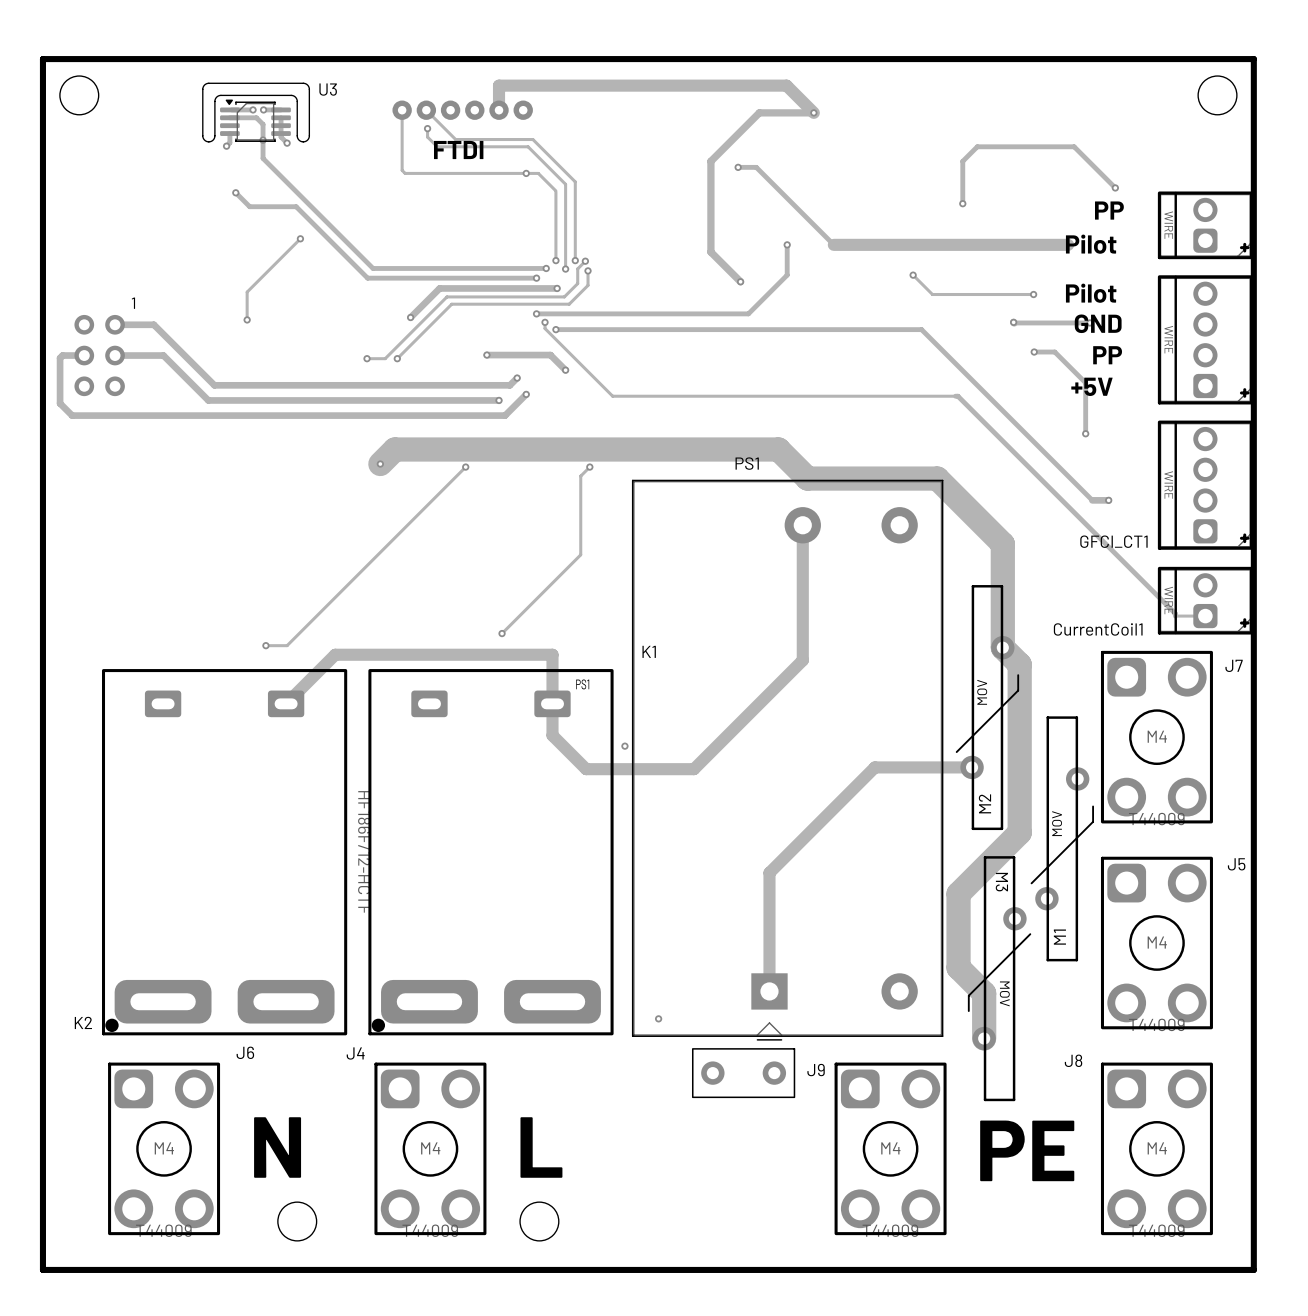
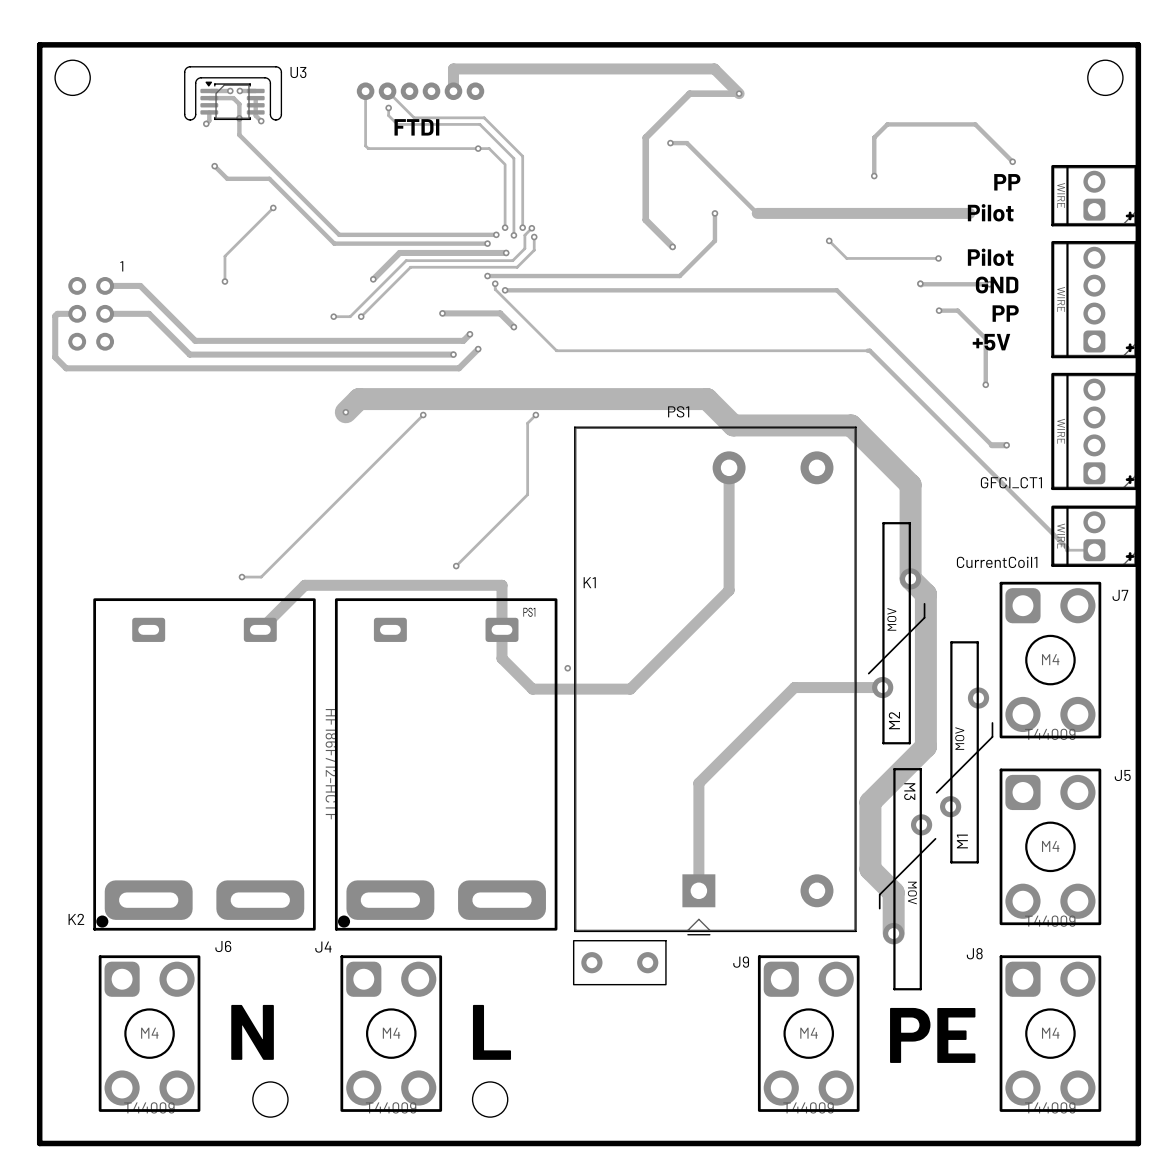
via: (658, 1018) -> none
part position: (743, 1073) -> (619, 962)

